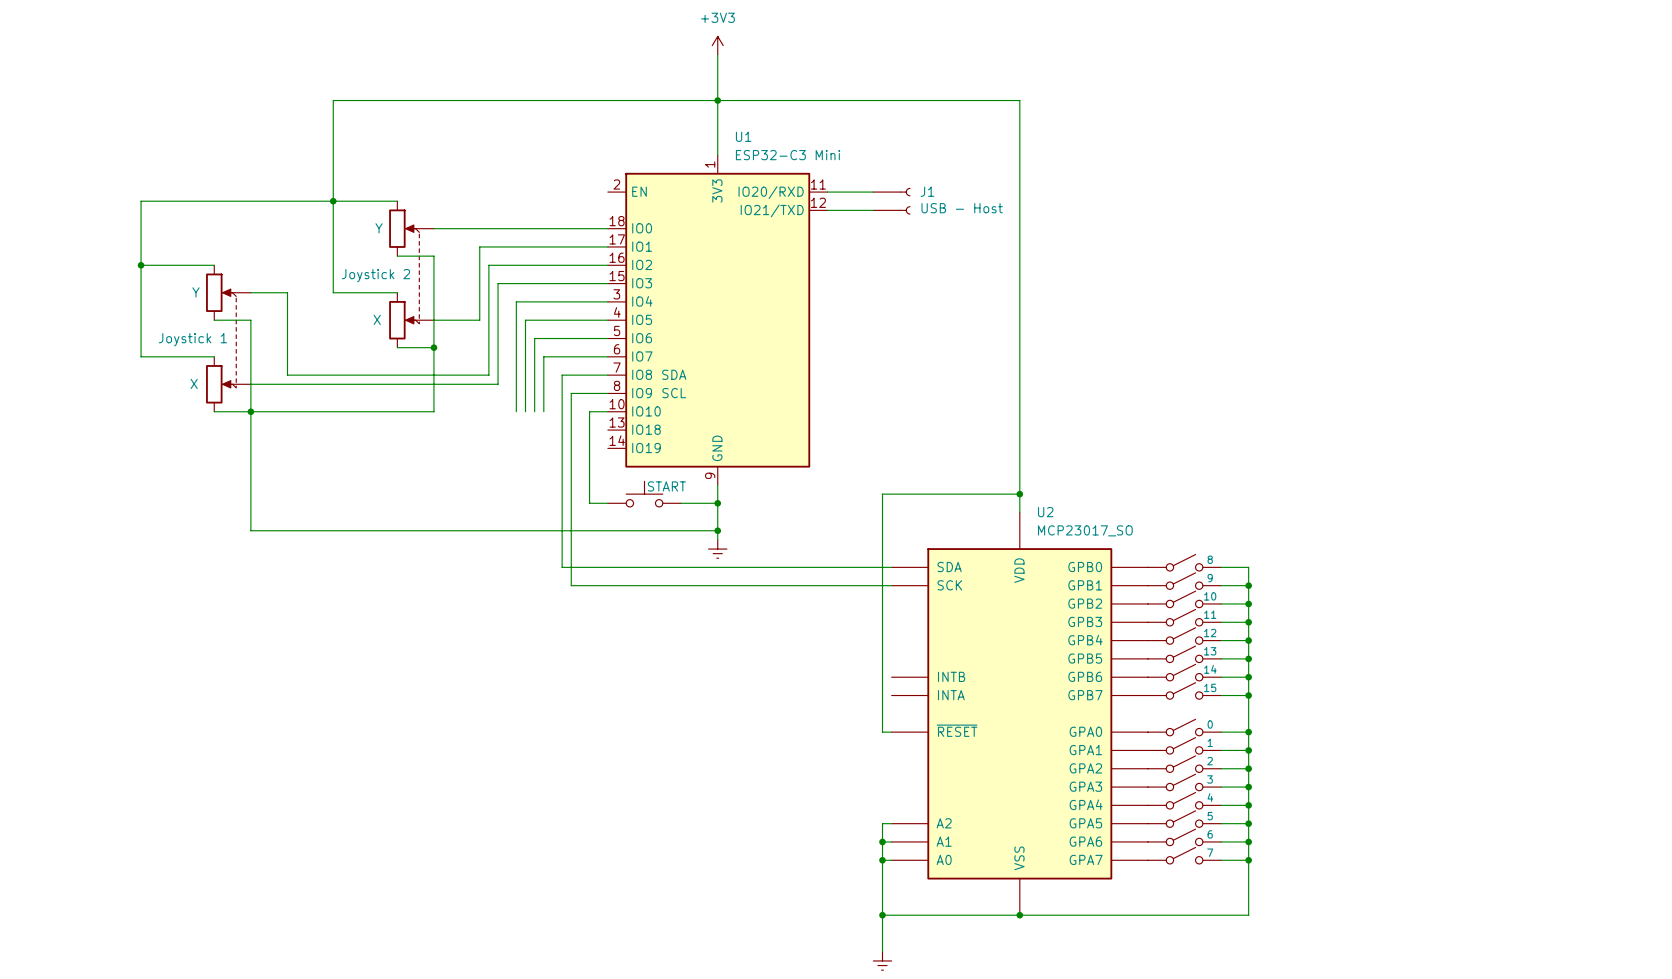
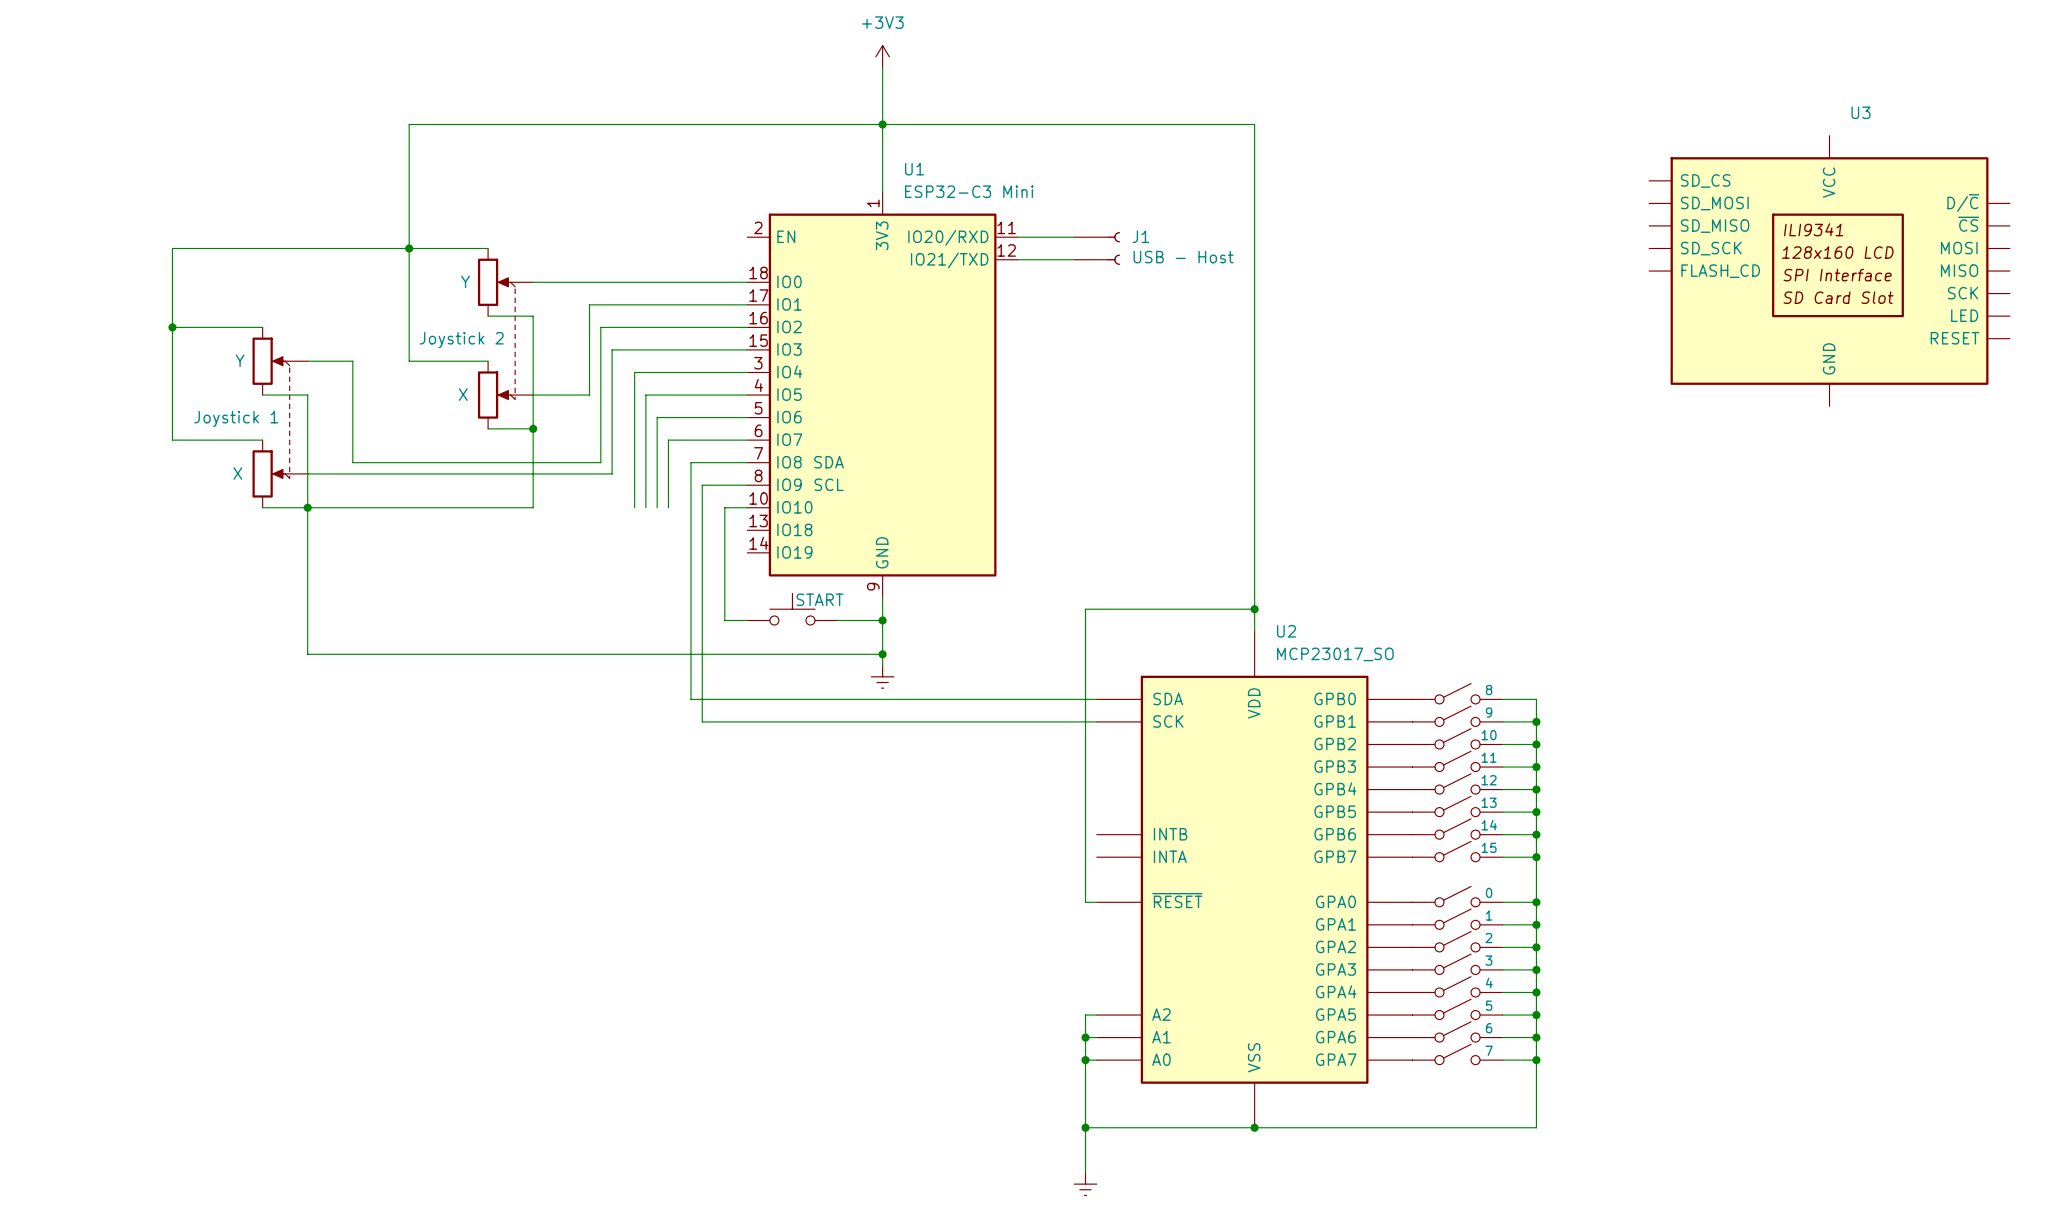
U3: none -> (1829, 271)

